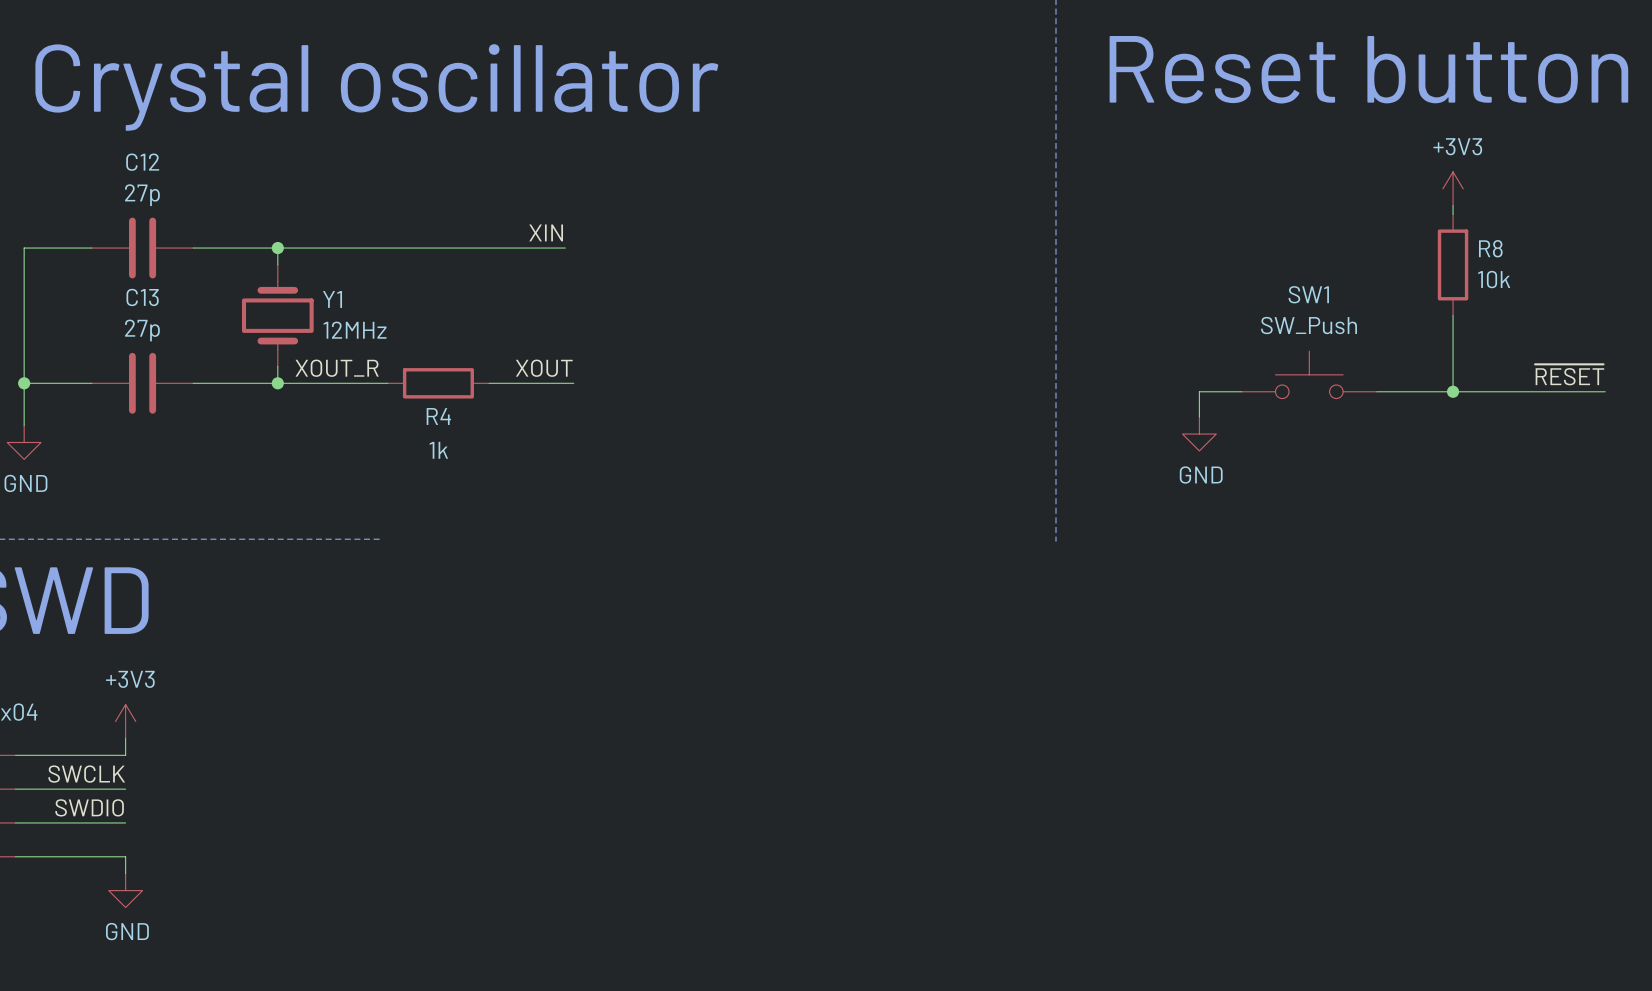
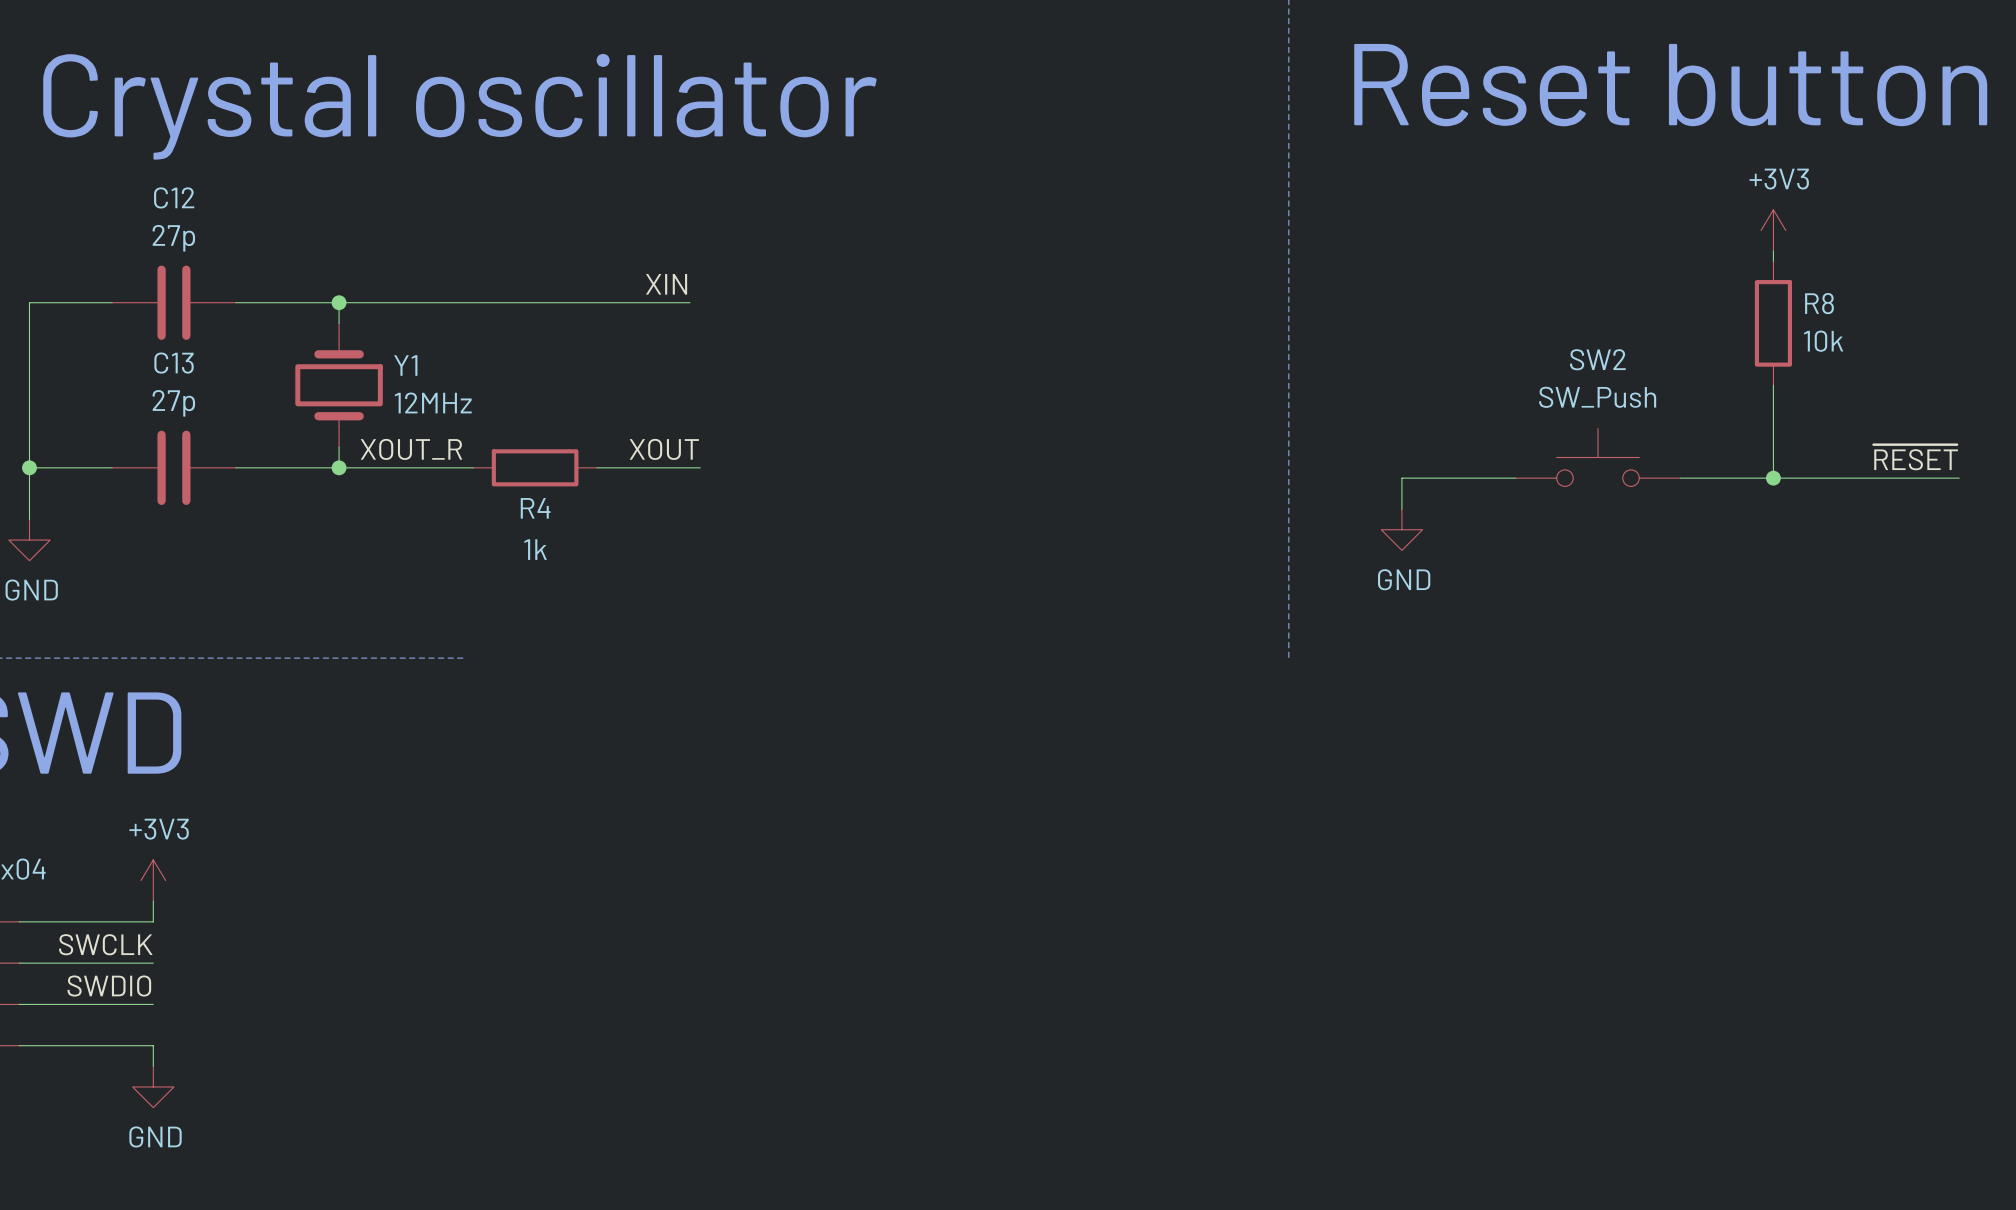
SW1 name: SW1 (1308, 294) -> SW2 (1597, 359)
wire: (1199, 391) (1199, 417) -> (1463, 478) (1401, 478) (1401, 509)
power symbol position: GND (1199, 434) -> GND (1401, 529)

